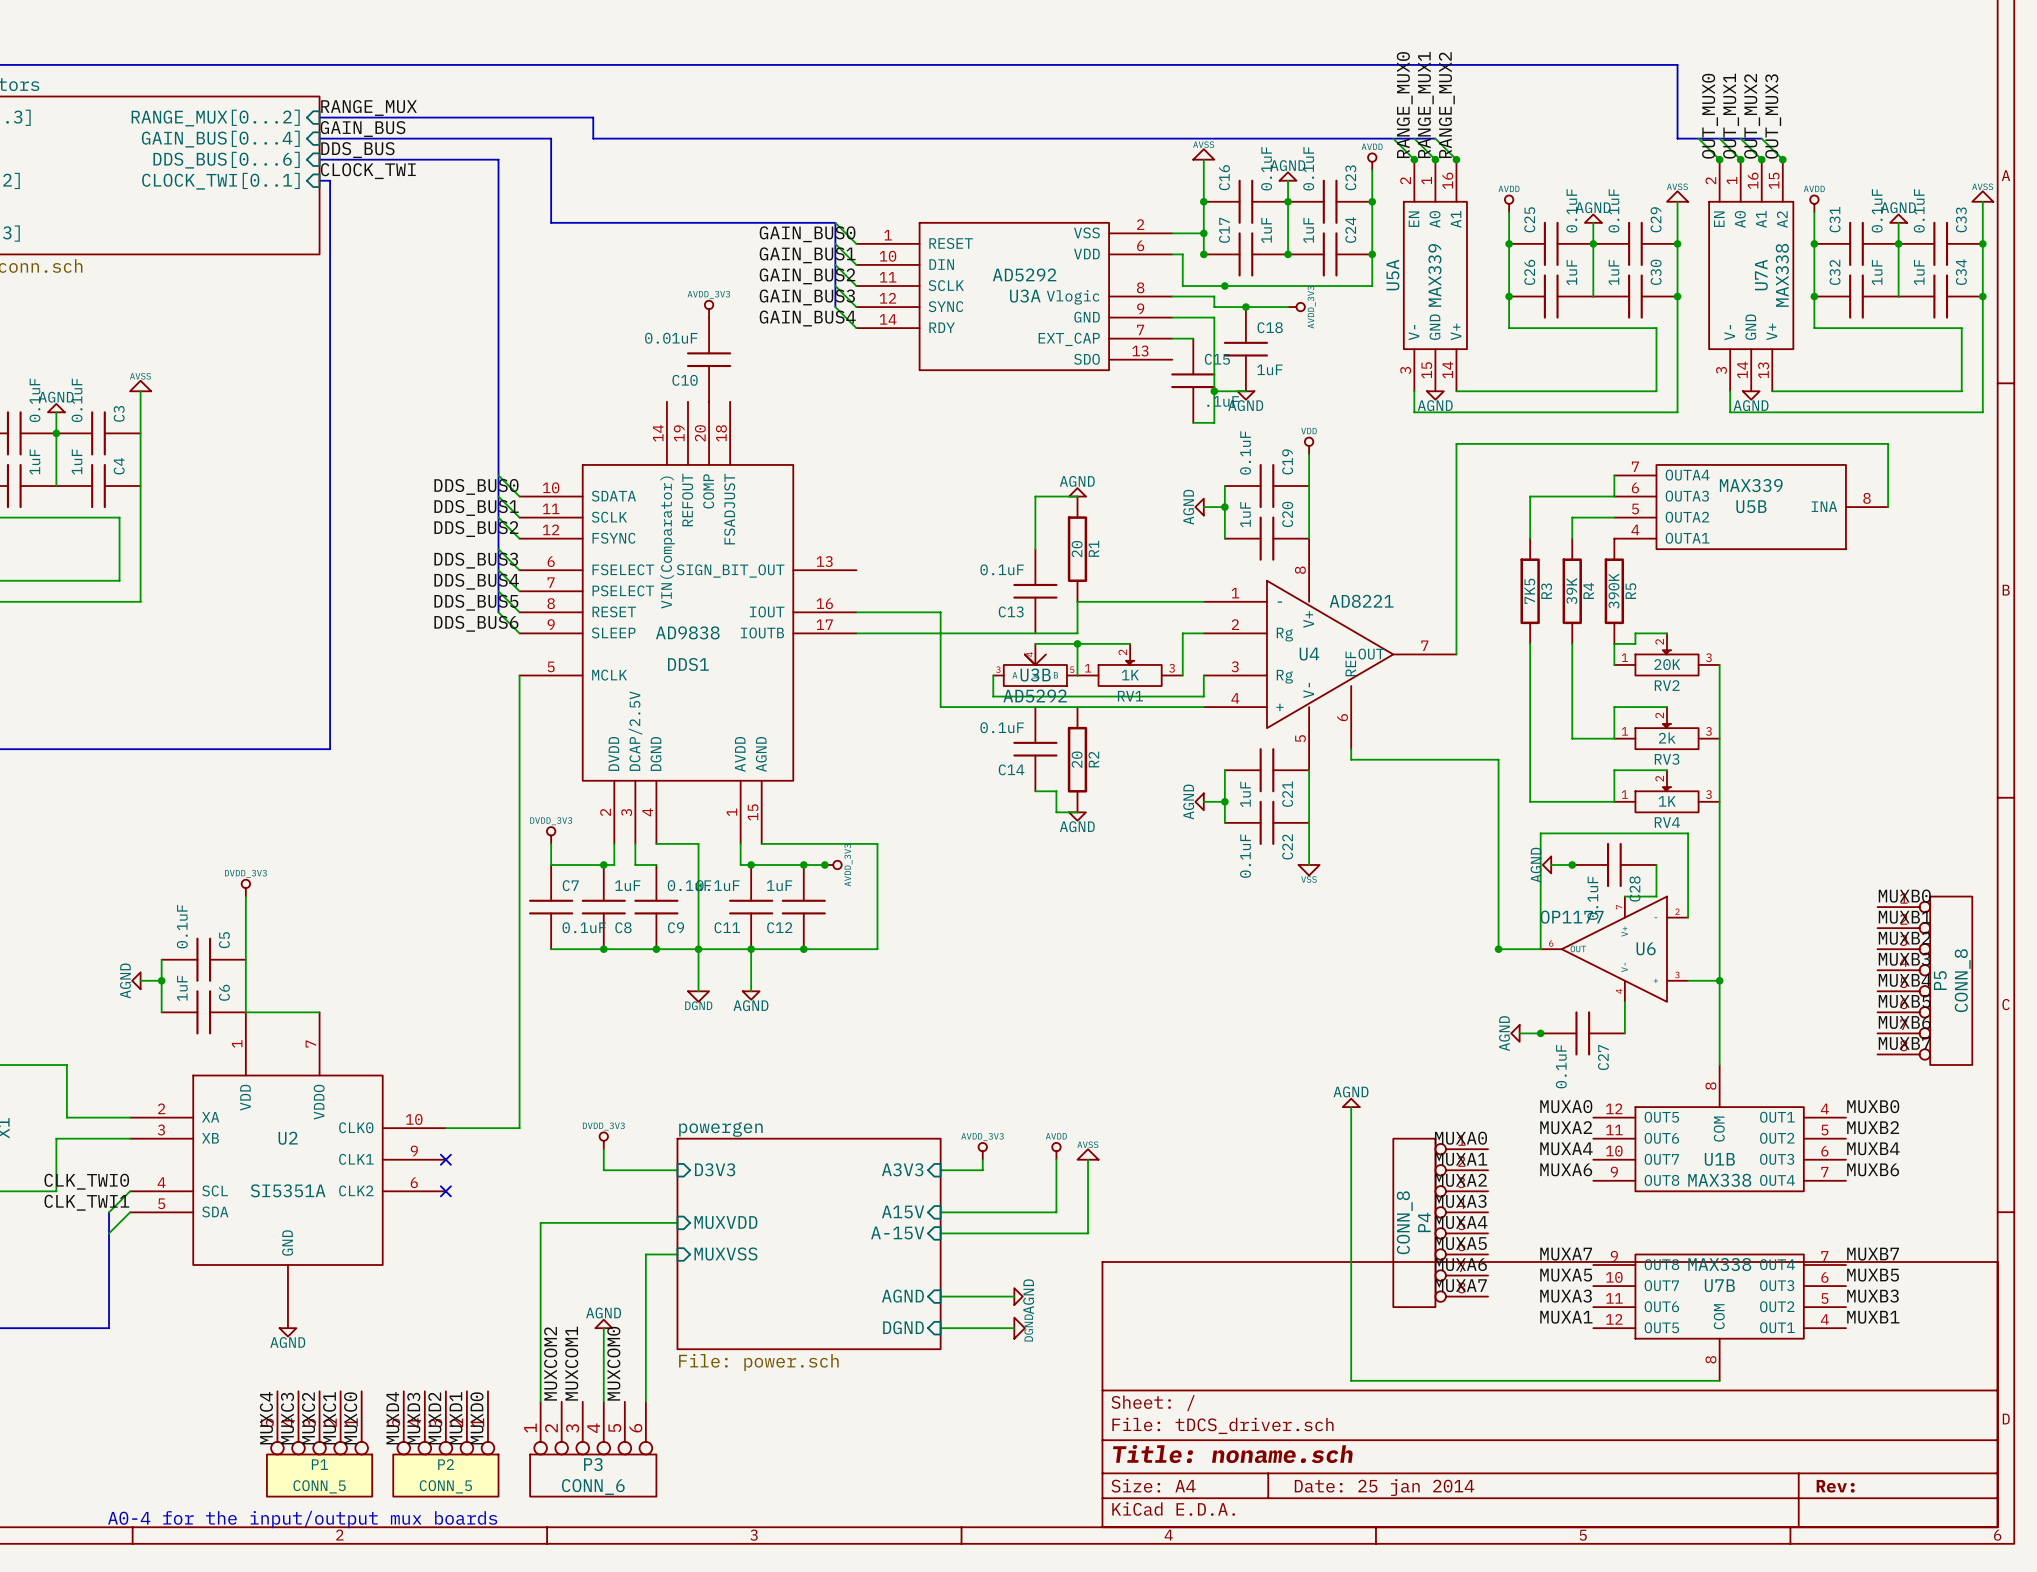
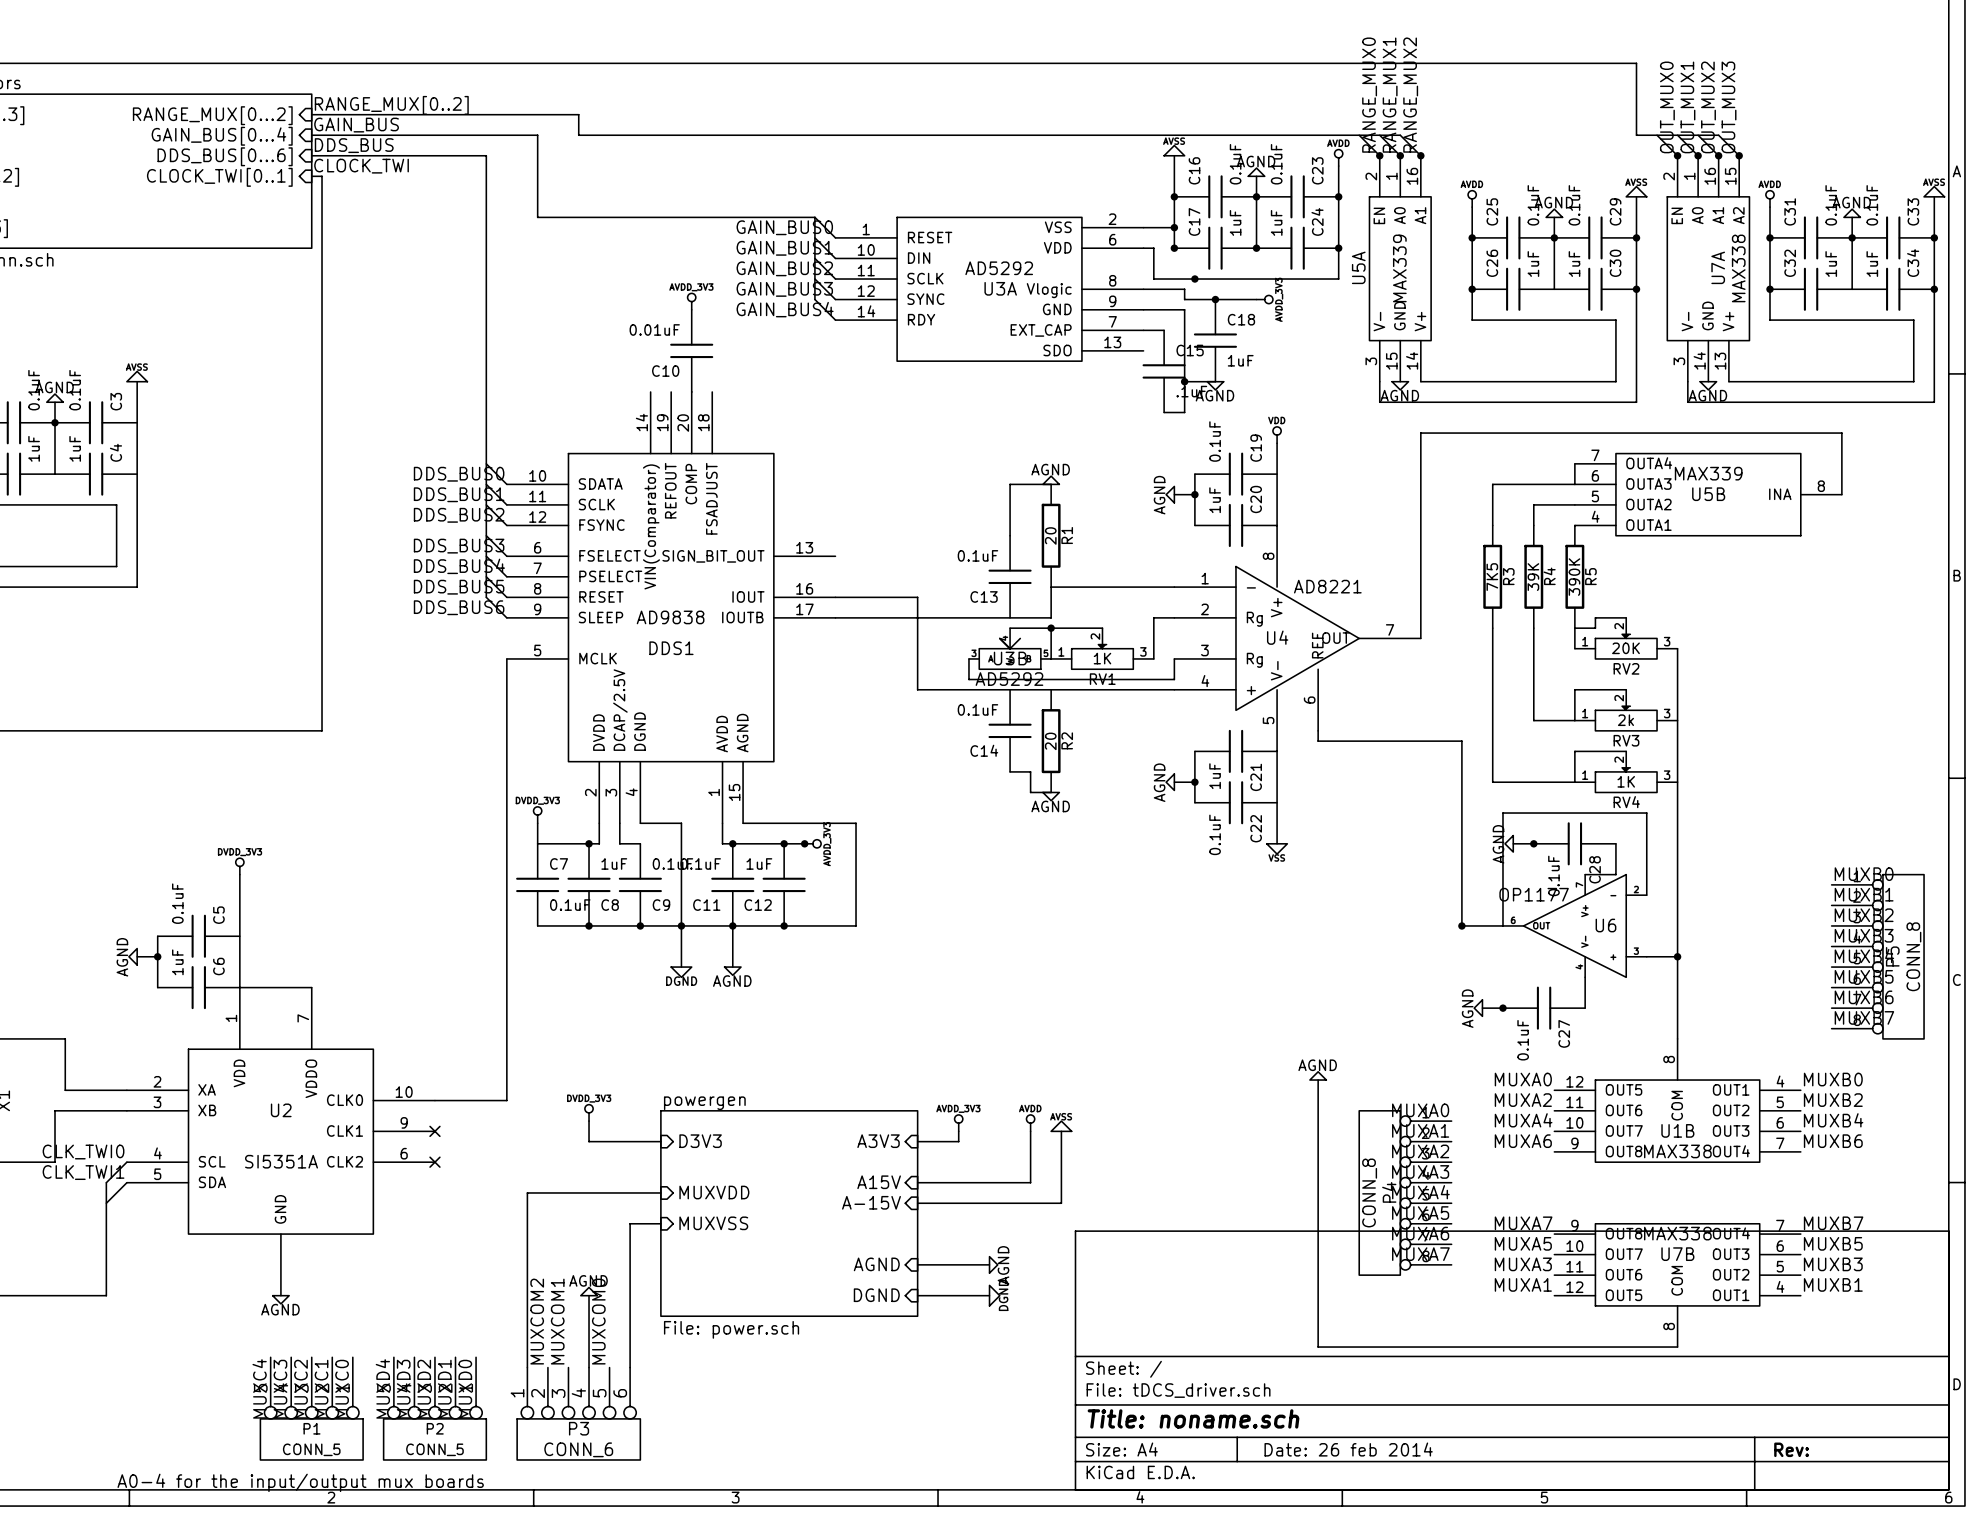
label: RANGE_MUX (369, 107) -> RANGE_MUX[0..2] (391, 105)
title block: Date: 25 jan 2014 (1384, 1487) -> Date: 26 feb 2014 (1348, 1449)

